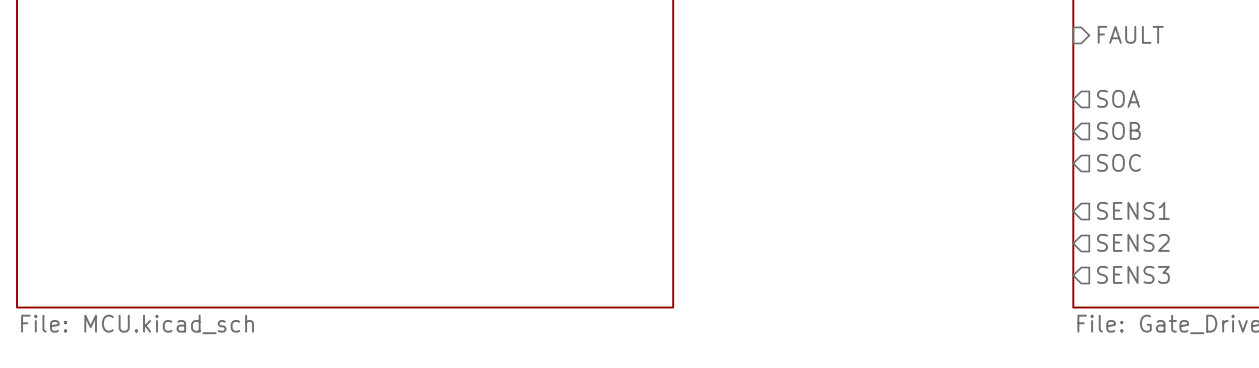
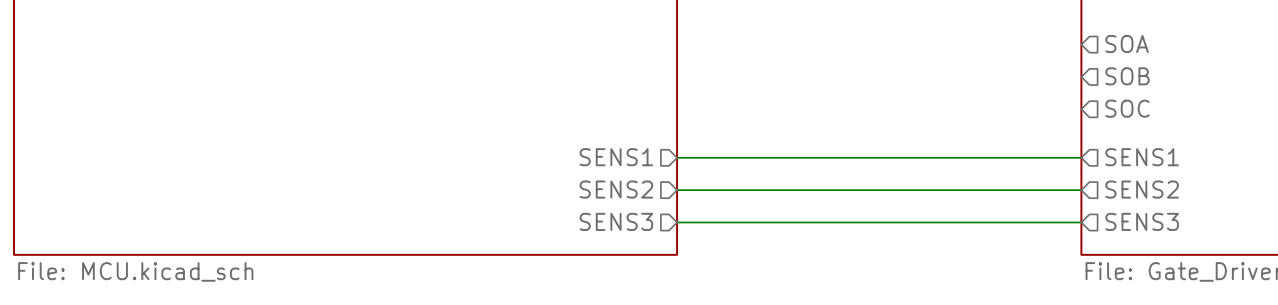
sheet pin: none -> SENS1 (616, 157)
wire: none -> (677, 157) (1081, 157)
sheet pin: none -> SENS2 (616, 189)
wire: none -> (677, 190) (1081, 190)
sheet pin: none -> SENS3 (616, 221)
wire: none -> (677, 222) (1081, 222)

